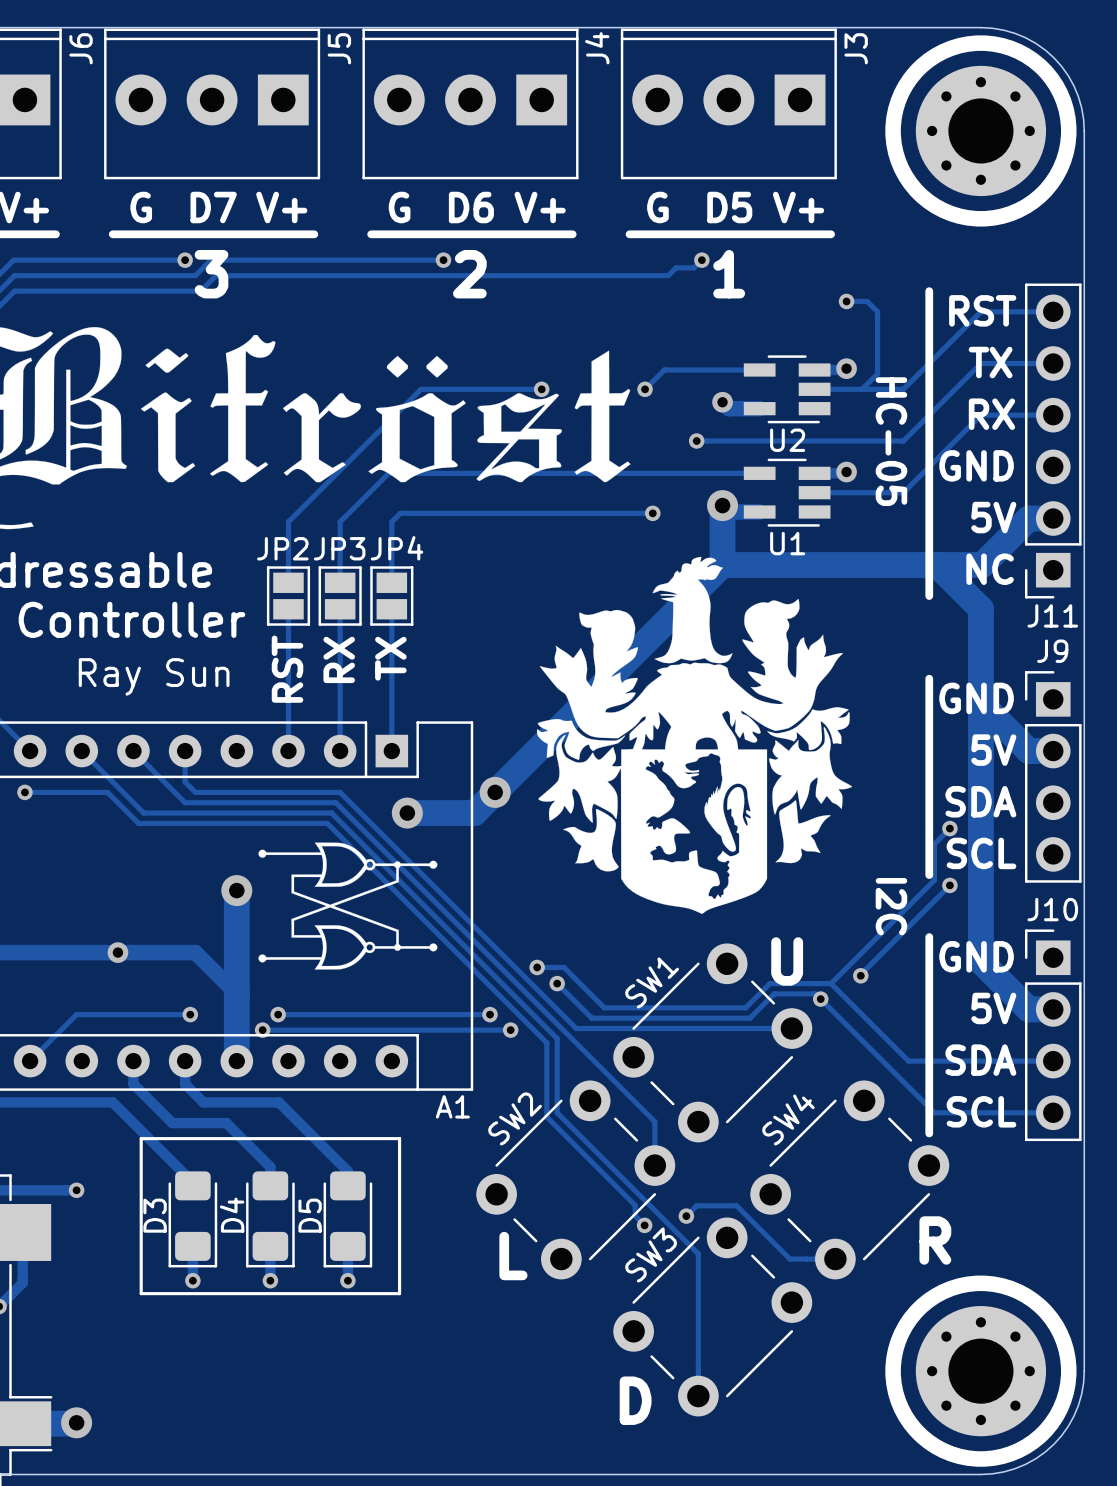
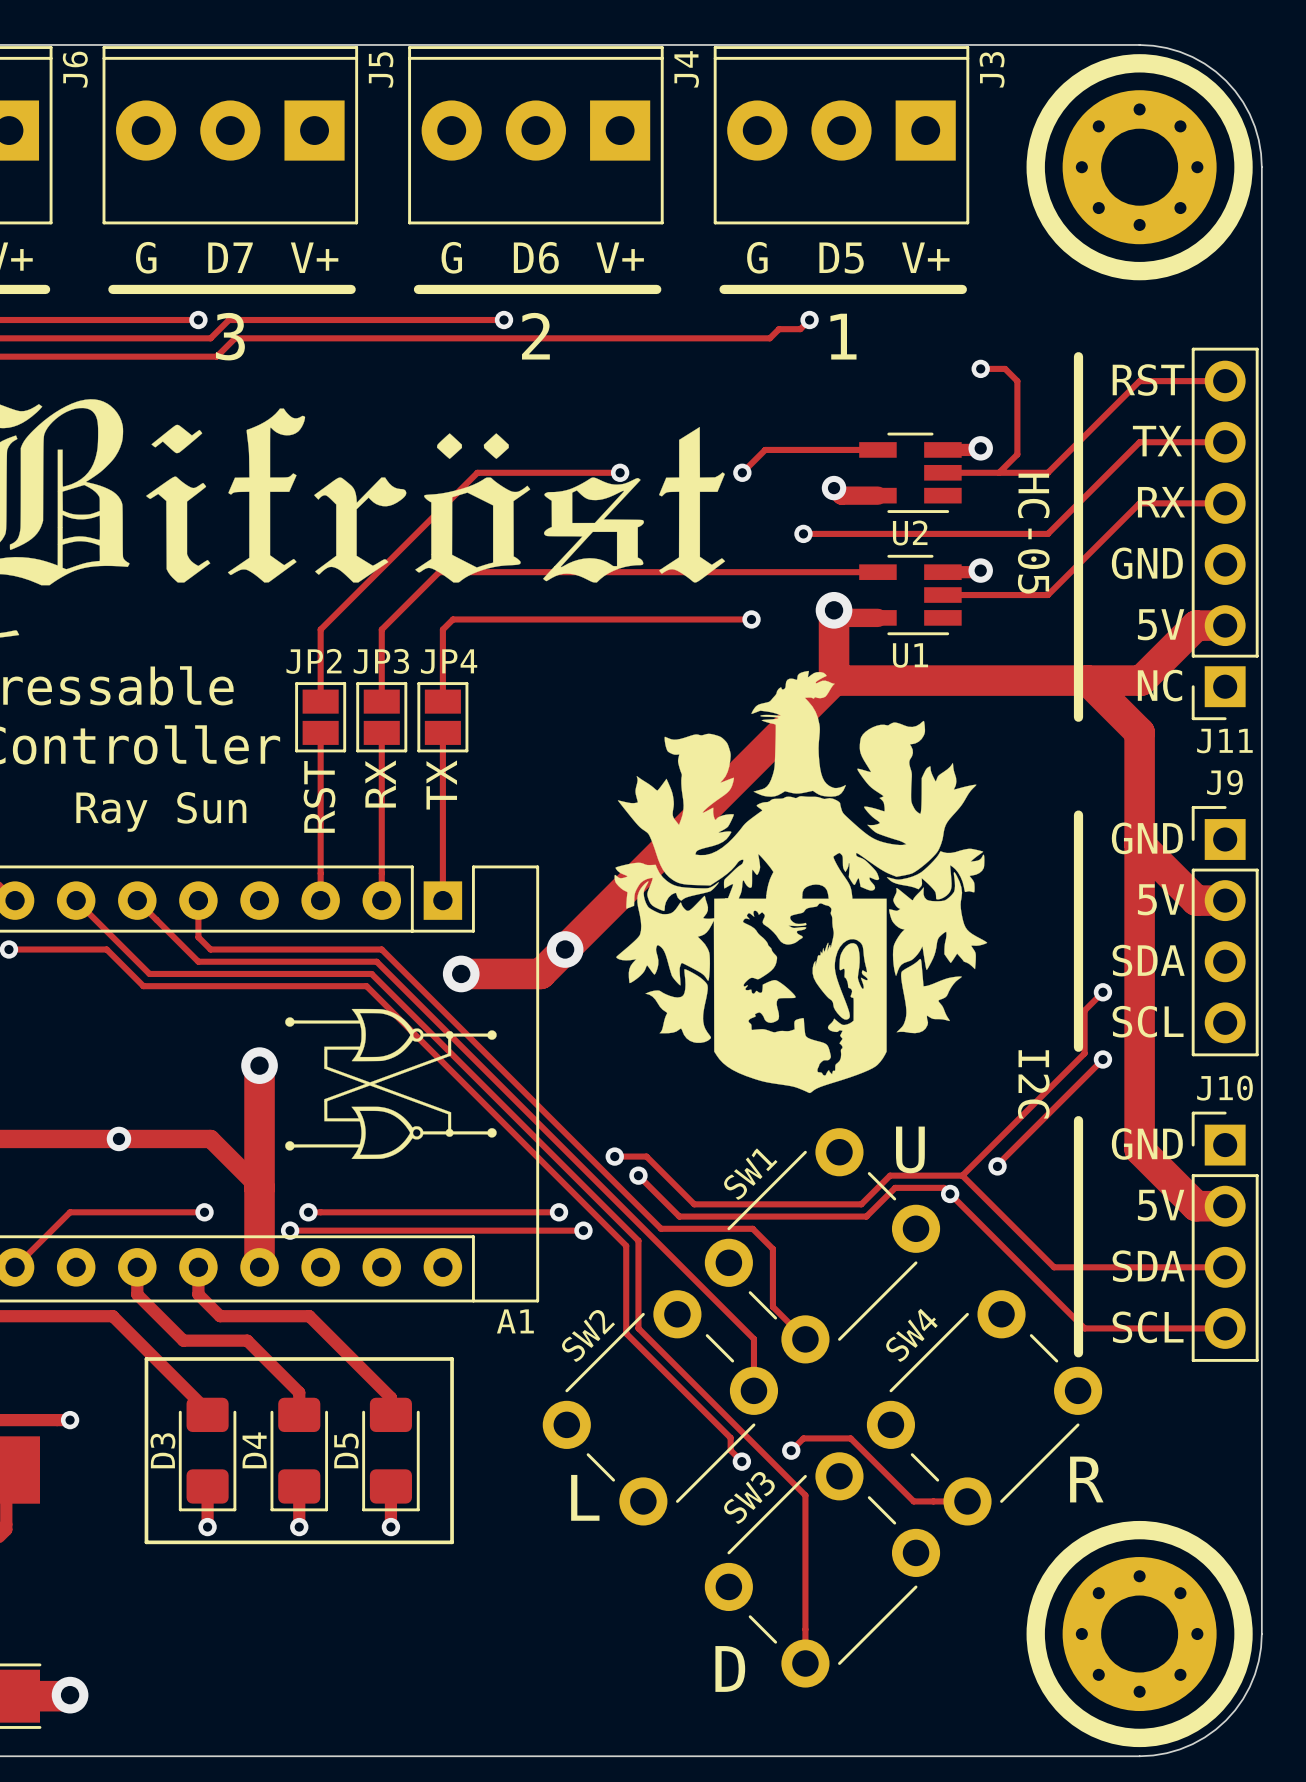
track: (653, 1028) (791, 1028) -> (752, 1228) (772, 1248) (772, 1306) (805, 1339)

